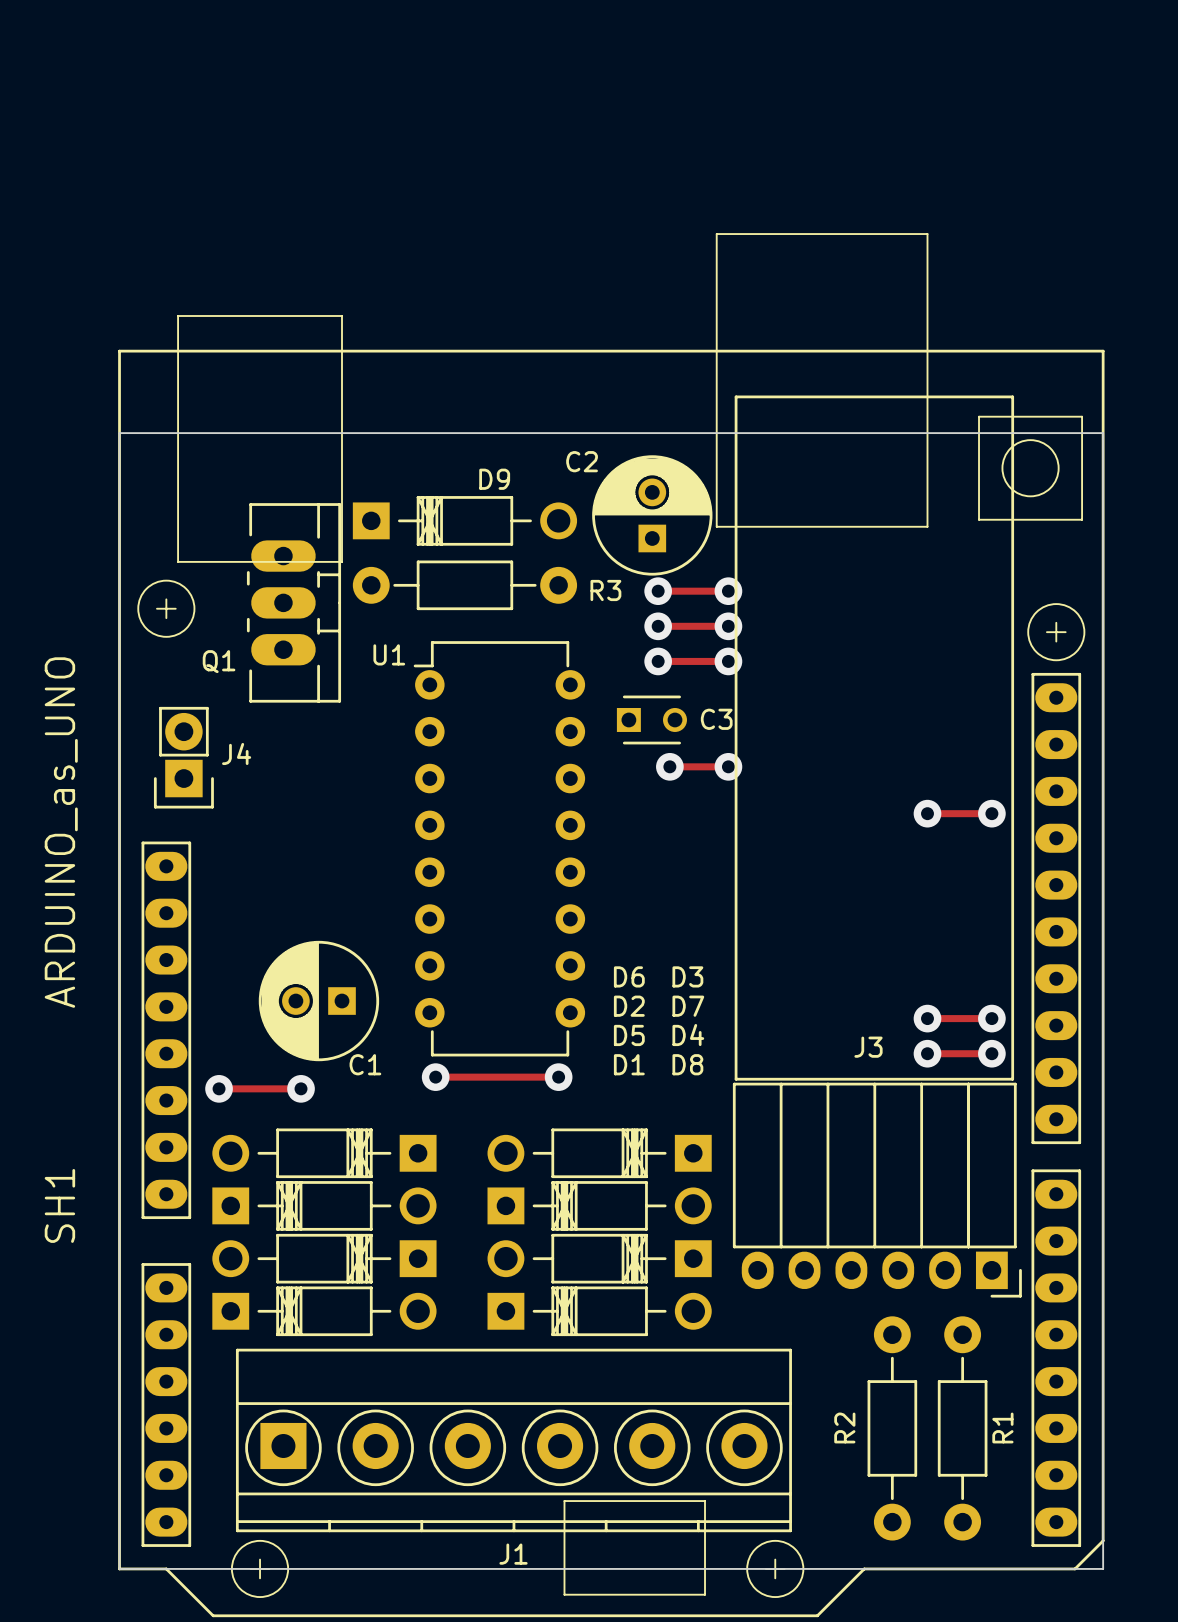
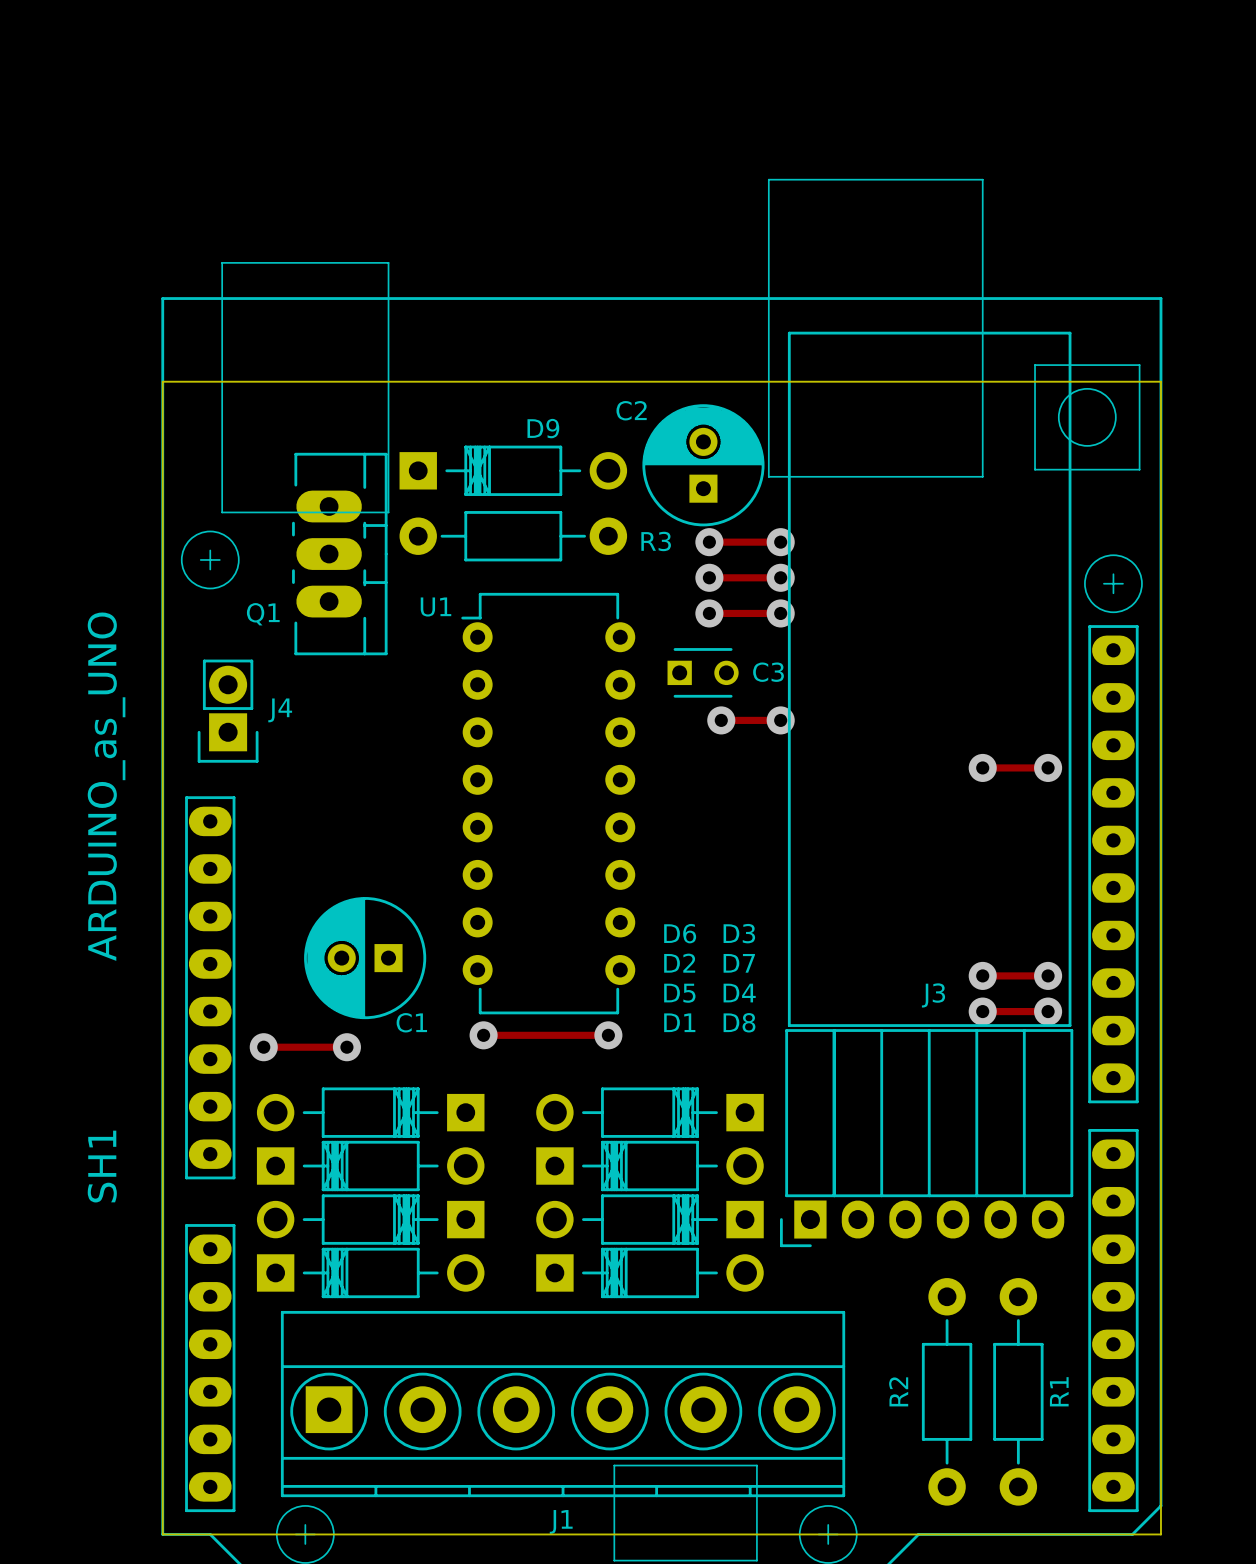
J3 footprint: [732, 395, 1022, 1298] -> [779, 331, 1074, 1248]

